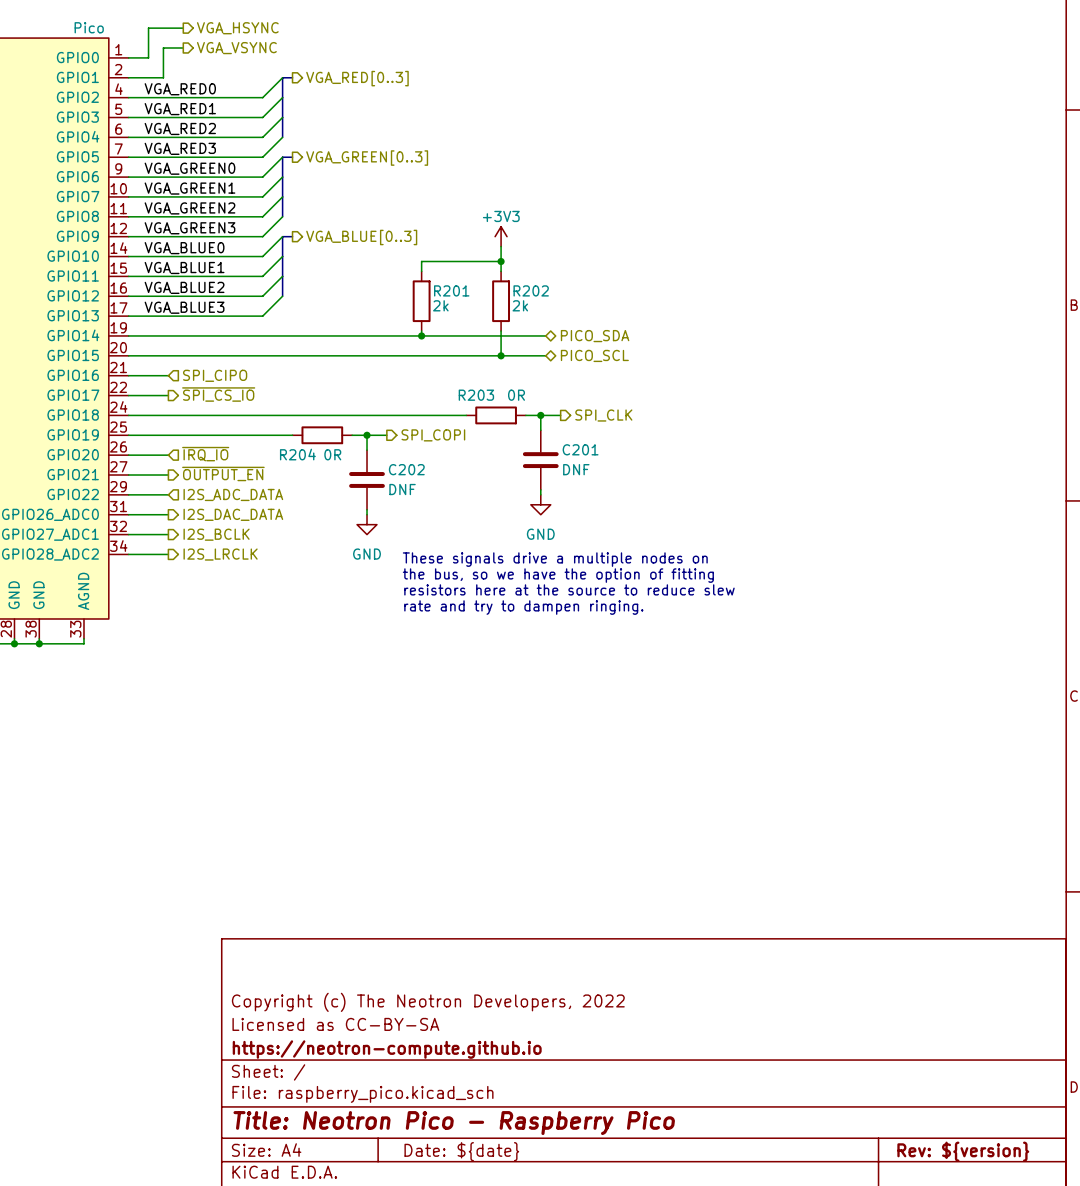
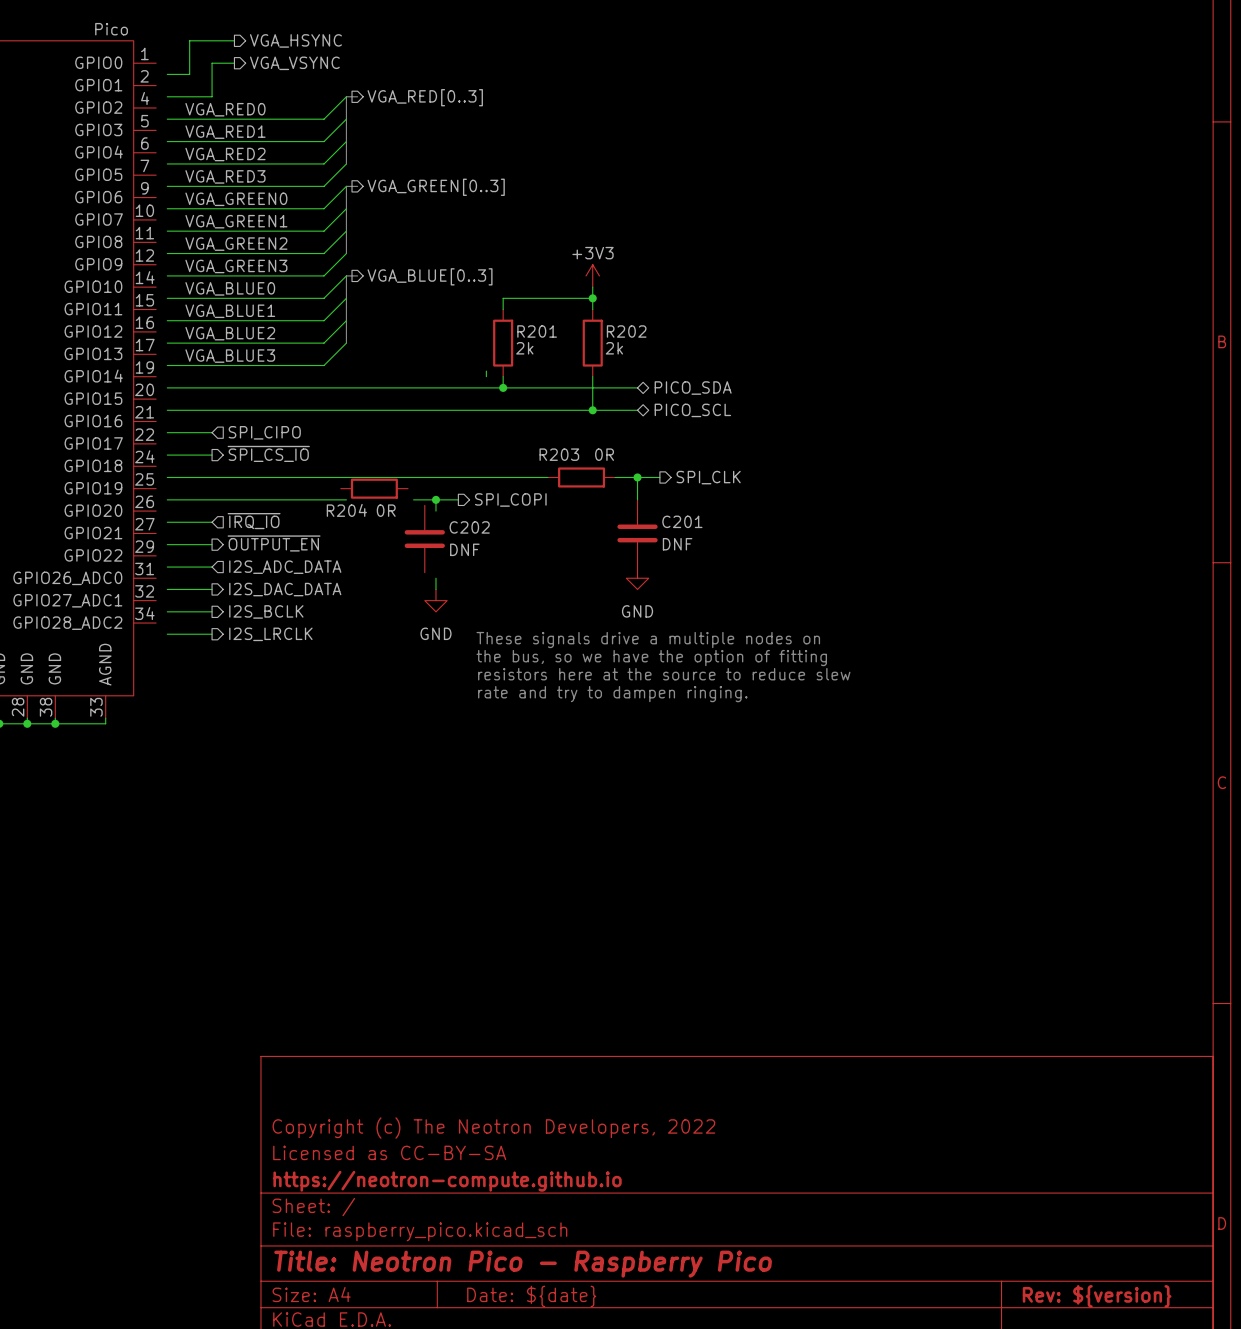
wire: (183, 28) (148, 28) (148, 57) (128, 57) -> none
hierarchical label position: VGA_HSYNC (237, 28) -> VGA_HSYNC (295, 40)
wire: none -> (234, 40) (189, 40) (189, 74) (167, 74)
wire: (183, 48) (163, 48) (163, 77) (128, 77) -> none
hierarchical label position: VGA_VSYNC (236, 48) -> VGA_VSYNC (294, 63)
wire: none -> (234, 63) (212, 63) (212, 96) (167, 96)
wire: (282, 77) (262, 97) (128, 97) -> none
bus: (292, 77) (282, 77) (282, 137) -> (357, 96) (346, 96) (346, 163)
hierarchical label position: VGA_RED[0..3] (357, 78) -> VGA_RED[0..3] (425, 97)
wire: none -> (346, 96) (324, 119) (167, 119)
label position: VGA_RED0 (180, 89) -> VGA_RED0 (225, 109)
wire: (282, 97) (262, 117) (128, 117) -> none
wire: none -> (346, 119) (324, 141) (167, 141)
label position: VGA_RED1 (180, 109) -> VGA_RED1 (225, 132)
wire: (282, 117) (262, 137) (128, 137) -> none
wire: none -> (346, 141) (324, 163) (167, 163)
label position: VGA_RED2 (180, 128) -> VGA_RED2 (225, 154)
wire: (282, 137) (262, 157) (128, 157) -> none
wire: none -> (346, 163) (324, 186) (167, 186)
label position: VGA_RED3 (180, 148) -> VGA_RED3 (225, 176)
wire: (282, 157) (262, 177) (128, 177) -> none
bus: (292, 157) (282, 157) (282, 216) -> (357, 186) (346, 186) (346, 253)
hierarchical label position: VGA_GREEN[0..3] (367, 158) -> VGA_GREEN[0..3] (436, 187)
wire: none -> (346, 186) (324, 208) (167, 208)
label position: VGA_GREEN0 (189, 168) -> VGA_GREEN0 (236, 199)
wire: (282, 177) (262, 196) (128, 196) -> none
wire: none -> (346, 208) (324, 231) (167, 231)
label position: VGA_GREEN1 (189, 188) -> VGA_GREEN1 (236, 221)
wire: (282, 196) (262, 216) (128, 216) -> none
wire: none -> (346, 231) (324, 253) (167, 253)
label position: VGA_GREEN2 (189, 208) -> VGA_GREEN2 (236, 244)
wire: (282, 216) (262, 236) (128, 236) -> none
wire: none -> (346, 253) (324, 275) (167, 275)
label position: VGA_GREEN3 (189, 228) -> VGA_GREEN3 (236, 266)
wire: (282, 236) (262, 256) (128, 256) -> none
bus: (292, 236) (282, 236) (282, 296) -> (357, 275) (346, 275) (346, 343)
power symbol position: +3V3 (501, 236) -> +3V3 (592, 275)
hierarchical label position: VGA_BLUE[0..3] (361, 237) -> VGA_BLUE[0..3] (430, 276)
wire: none -> (346, 275) (324, 298) (167, 298)
wire: (501, 246) (501, 271) -> none
label position: VGA_BLUE0 (184, 248) -> VGA_BLUE0 (230, 288)
wire: (282, 256) (262, 276) (128, 276) -> none
wire: none -> (592, 287) (592, 309)
wire: (501, 261) (421, 261) (421, 271) -> (592, 298) (503, 298) (503, 309)
junction position: (501, 261) -> (592, 298)
wire: none -> (346, 298) (324, 320) (167, 320)
label position: VGA_BLUE1 (184, 268) -> VGA_BLUE1 (230, 311)
wire: (282, 276) (262, 296) (128, 296) -> none
wire: none -> (346, 320) (324, 343) (167, 343)
label position: VGA_BLUE2 (184, 287) -> VGA_BLUE2 (230, 333)
wire: (282, 296) (262, 316) (128, 316) -> none
R201 position: (421, 301) -> (503, 343)
R202 position: (501, 301) -> (592, 343)
wire: none -> (346, 343) (324, 365) (167, 365)
label position: VGA_BLUE3 (184, 307) -> VGA_BLUE3 (230, 356)
wire: (501, 331) (501, 355) -> none
wire: (128, 335) (545, 335) -> (167, 387) (637, 387)
junction position: (421, 335) -> (503, 387)
wire: none -> (503, 376) (503, 387)
wire: none -> (592, 376) (592, 410)
hierarchical label position: PICO_SDA (595, 336) -> PICO_SDA (693, 388)
wire: (128, 355) (545, 355) -> (167, 410) (637, 410)
junction position: (501, 355) -> (592, 410)
hierarchical label position: PICO_SCL (594, 355) -> PICO_SCL (692, 410)
wire: (128, 375) (168, 375) -> (167, 432) (212, 432)
hierarchical label position: SPI_CIPO (215, 375) -> SPI_CIPO (264, 432)
hierarchical label position: ~{SPI_CS_IO} (218, 394) -> ~{SPI_CS_IO} (268, 453)
wire: (128, 395) (168, 395) -> (167, 455) (212, 455)
wire: (128, 415) (466, 415) -> (167, 477) (547, 477)
R203 position: (496, 415) -> (581, 477)
wire: (525, 415) (560, 415) -> none
wire: (540, 415) (540, 430) -> none
junction position: (540, 415) -> (637, 477)
hierarchical label position: SPI_CLK (603, 415) -> SPI_CLK (708, 477)
wire: none -> (615, 477) (659, 477)
wire: none -> (637, 477) (637, 499)
wire: (128, 435) (292, 435) -> none
wire: (352, 435) (386, 435) -> none
wire: (367, 435) (367, 450) -> none
junction position: (367, 435) -> (435, 499)
hierarchical label position: SPI_COPI (433, 435) -> SPI_COPI (510, 499)
wire: none -> (167, 499) (346, 499)
wire: none -> (413, 499) (458, 499)
wire: none -> (435, 499) (435, 511)
hierarchical label position: ~{IRQ_IO} (205, 454) -> ~{IRQ_IO} (254, 521)
wire: (128, 455) (168, 455) -> (167, 522) (212, 522)
C201 position: (540, 460) -> (637, 533)
hierarchical label position: ~{OUTPUT_EN} (223, 473) -> ~{OUTPUT_EN} (274, 543)
wire: (128, 475) (168, 475) -> (167, 544) (212, 544)
wire: (540, 489) (540, 494) -> none
wire: (128, 494) (168, 494) -> (167, 567) (212, 567)
hierarchical label position: I2S_ADC_DATA (233, 494) -> I2S_ADC_DATA (285, 567)
power symbol position: GND (540, 504) -> GND (637, 578)
wire: (367, 509) (367, 514) -> none
wire: (128, 514) (168, 514) -> (167, 589) (212, 589)
hierarchical label position: I2S_DAC_DATA (233, 514) -> I2S_DAC_DATA (285, 589)
wire: none -> (435, 578) (435, 589)
power symbol position: GND (367, 524) -> GND (435, 600)
wire: (128, 534) (168, 534) -> (167, 611) (212, 611)
hierarchical label position: I2S_BCLK (216, 534) -> I2S_BCLK (266, 611)
wire: (128, 554) (168, 554) -> (167, 634) (212, 634)
hierarchical label position: I2S_LRCLK (220, 554) -> I2S_LRCLK (270, 634)
text position: These signals drive a multiple nodes on (555, 559) -> These signals drive a multiple nodes on (648, 640)
text position: the bus, so we have the option of fitting (558, 575) -> the bus, so we have the option of fitting (651, 658)
text position: resistors here at the source to reduce slew (569, 589) -> resistors here at the source to reduce slew (664, 674)
text position: rate and try to dampen ringing. (523, 607) -> rate and try to dampen ringing. (612, 694)

